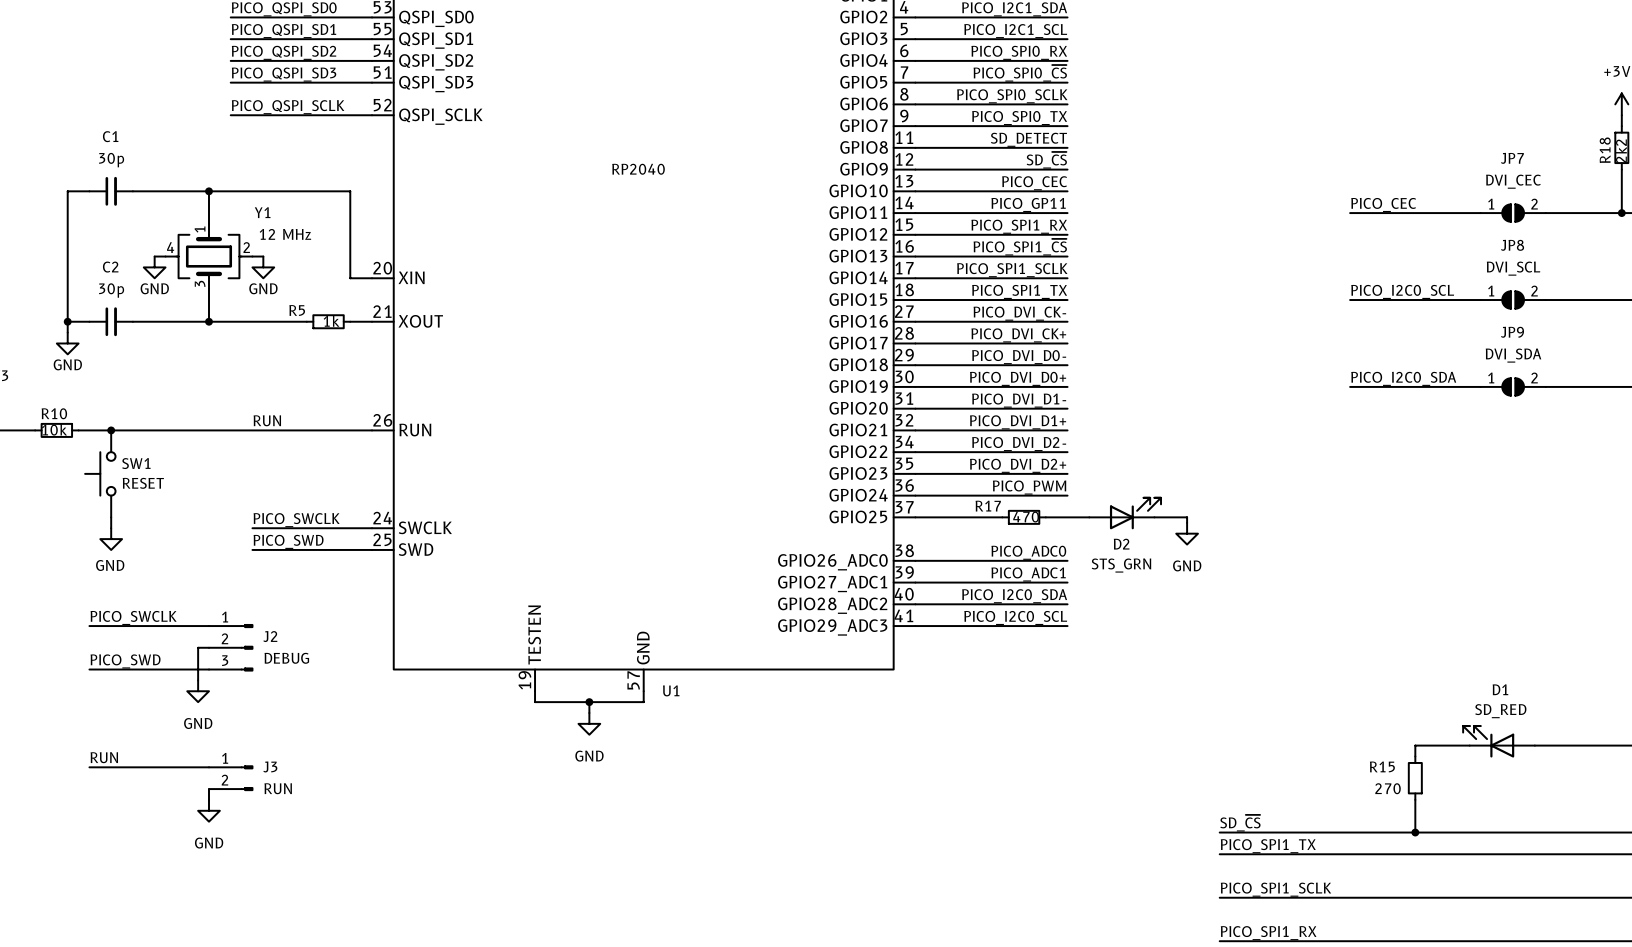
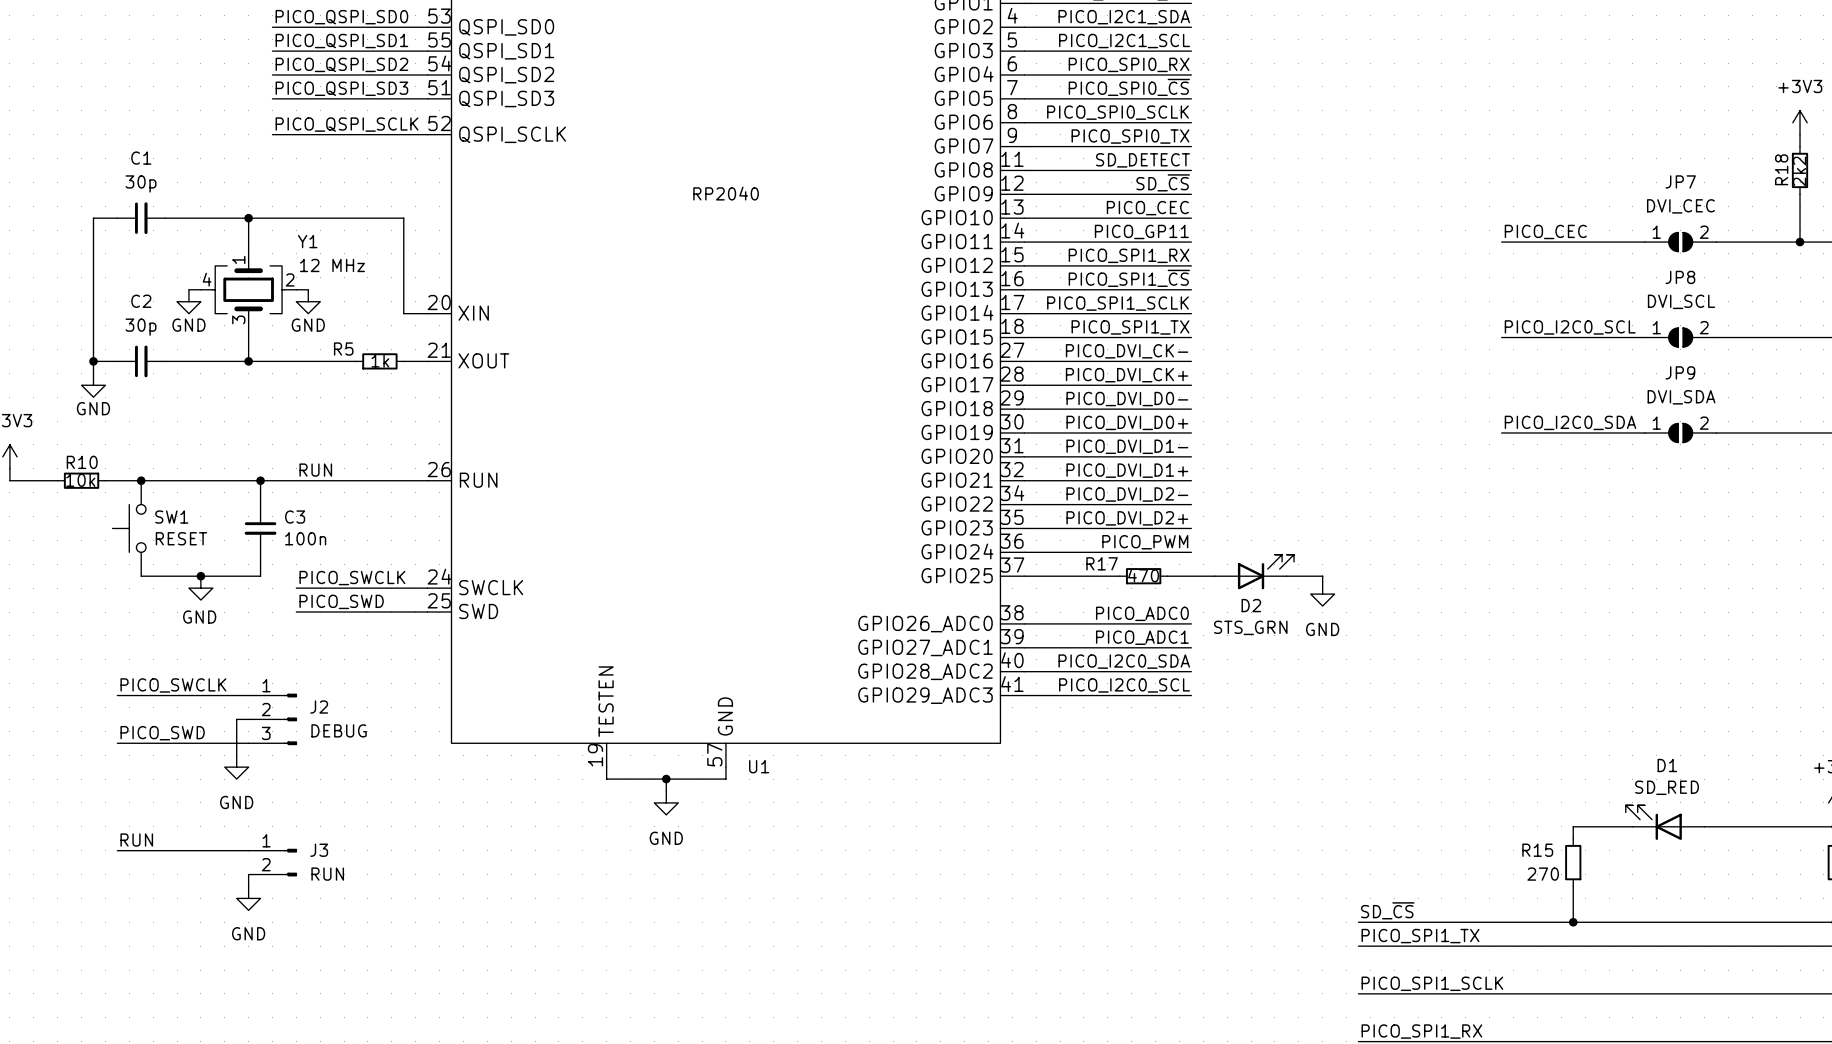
wire: none -> (260, 480) (260, 504)
junction: none -> (260, 480)
C3: none -> 100n (260, 528)
wire: (111, 517) (111, 528) -> (141, 576) (260, 576) (260, 552)
junction: none -> (200, 576)
power symbol position: GND (111, 539) -> GND (200, 588)

